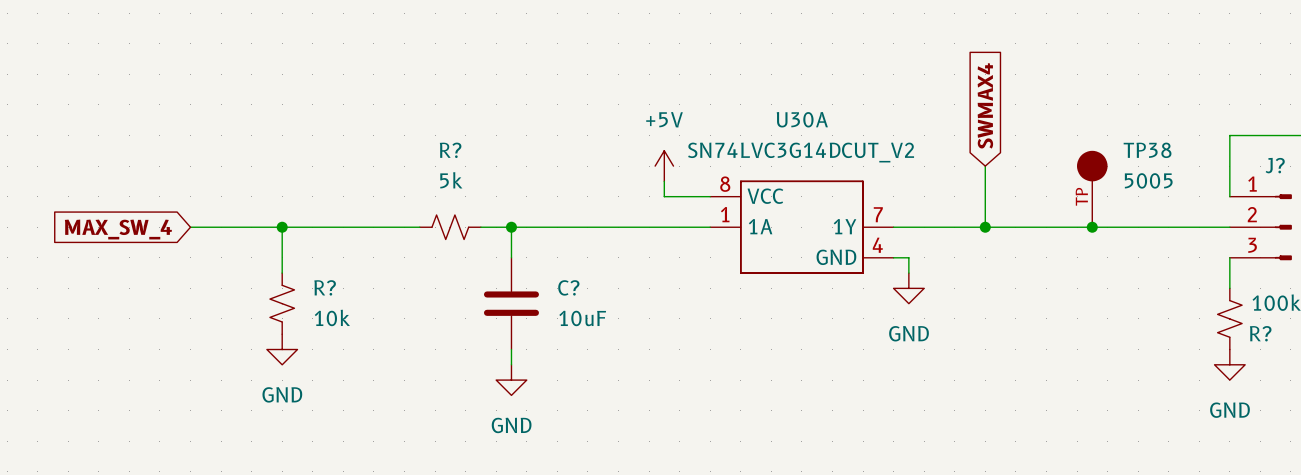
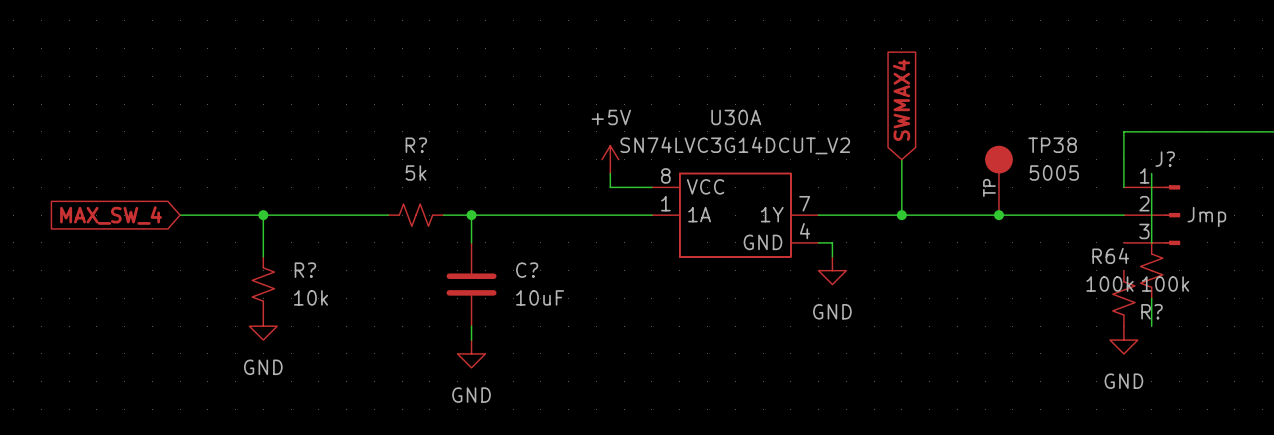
wire: none -> (1151, 173) (1151, 242)
wire: (1229, 257) (1229, 288) -> (1151, 298) (1151, 326)
R64: none -> 100k (1151, 270)

